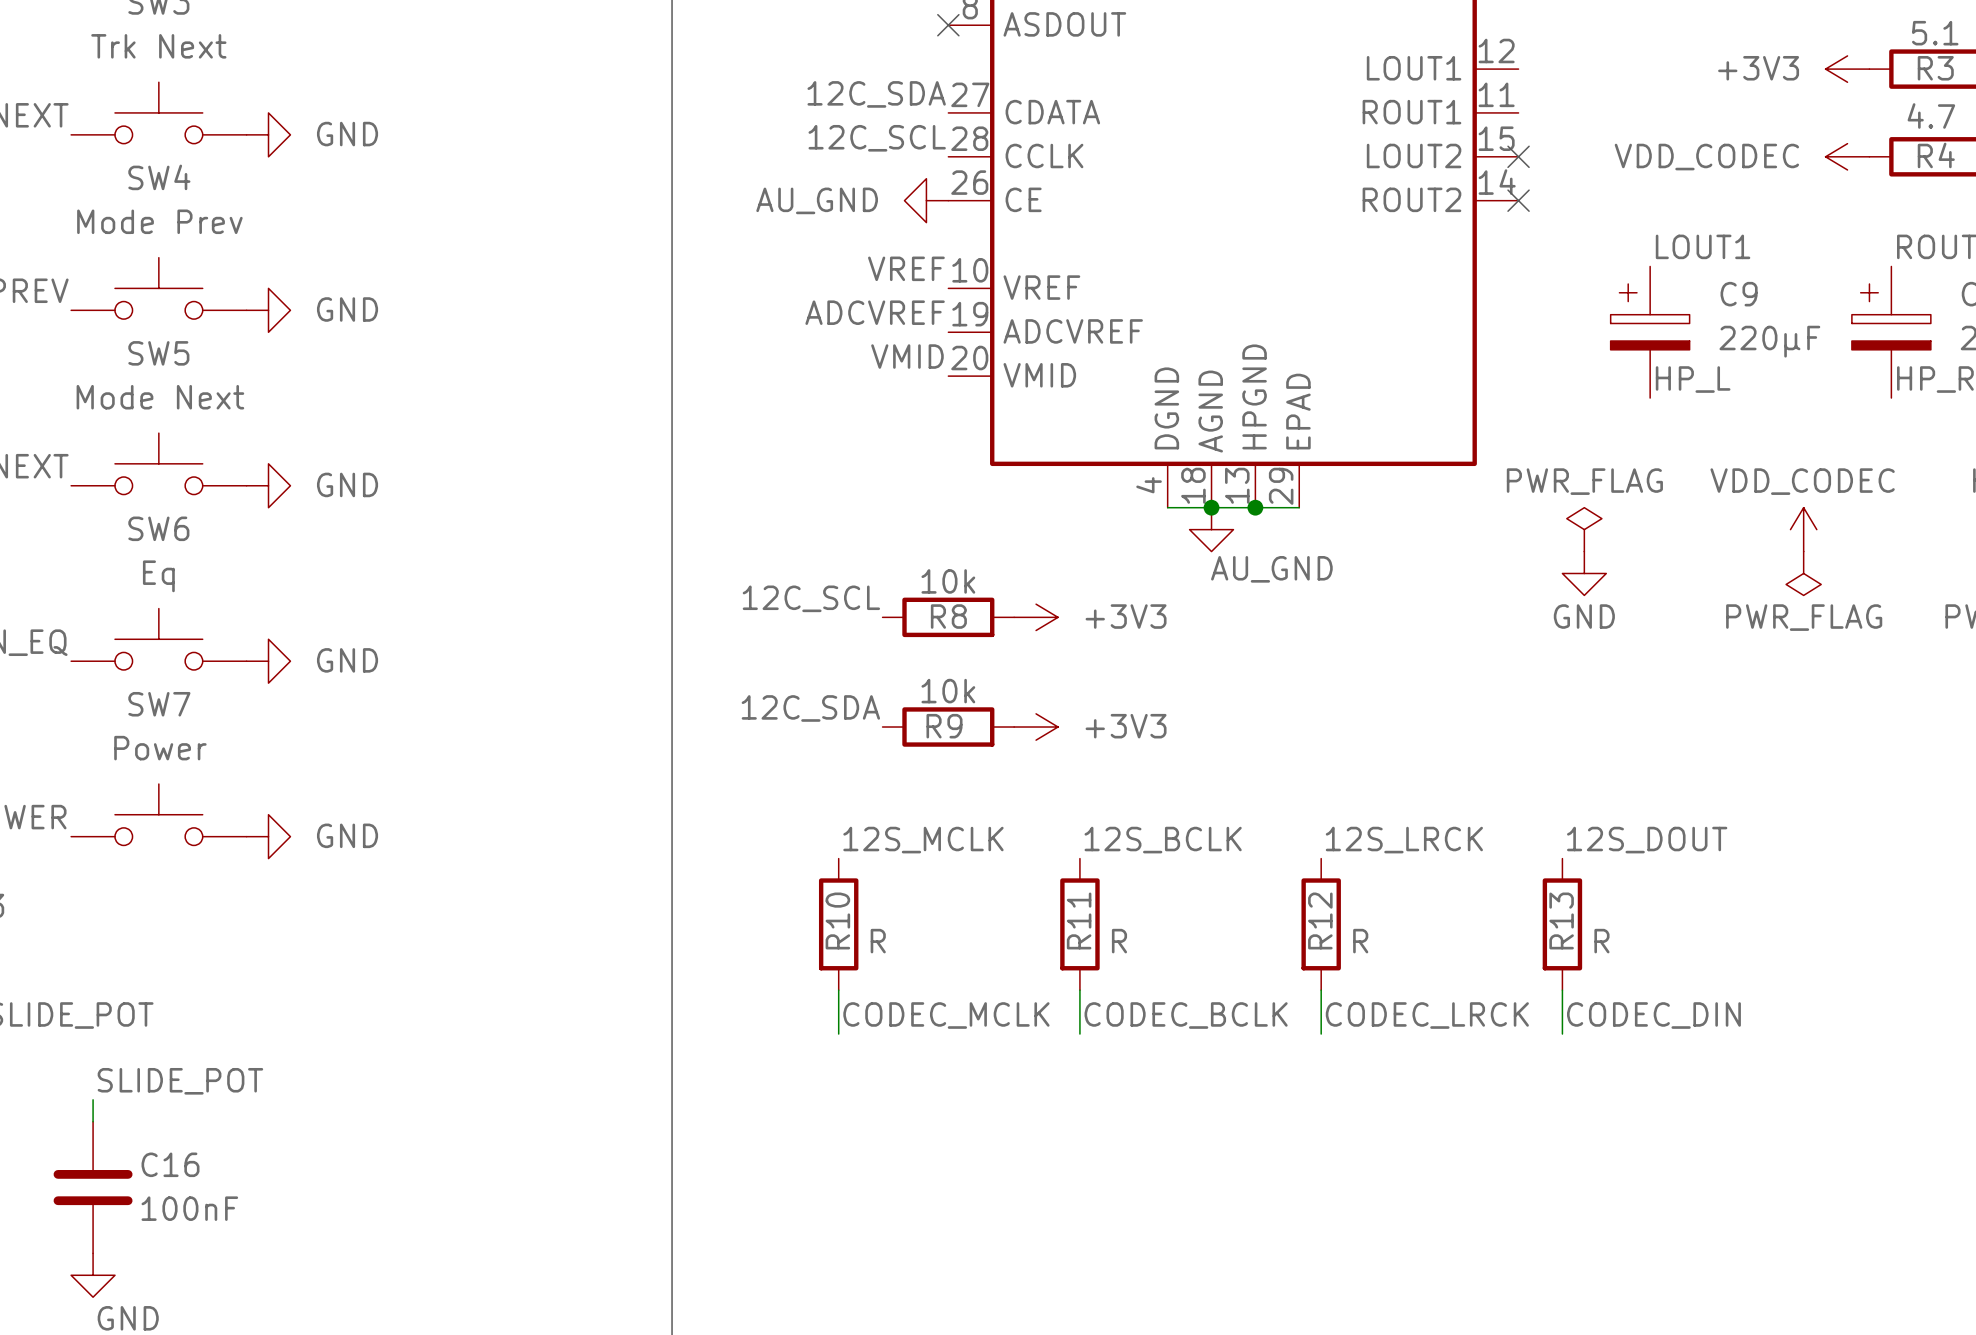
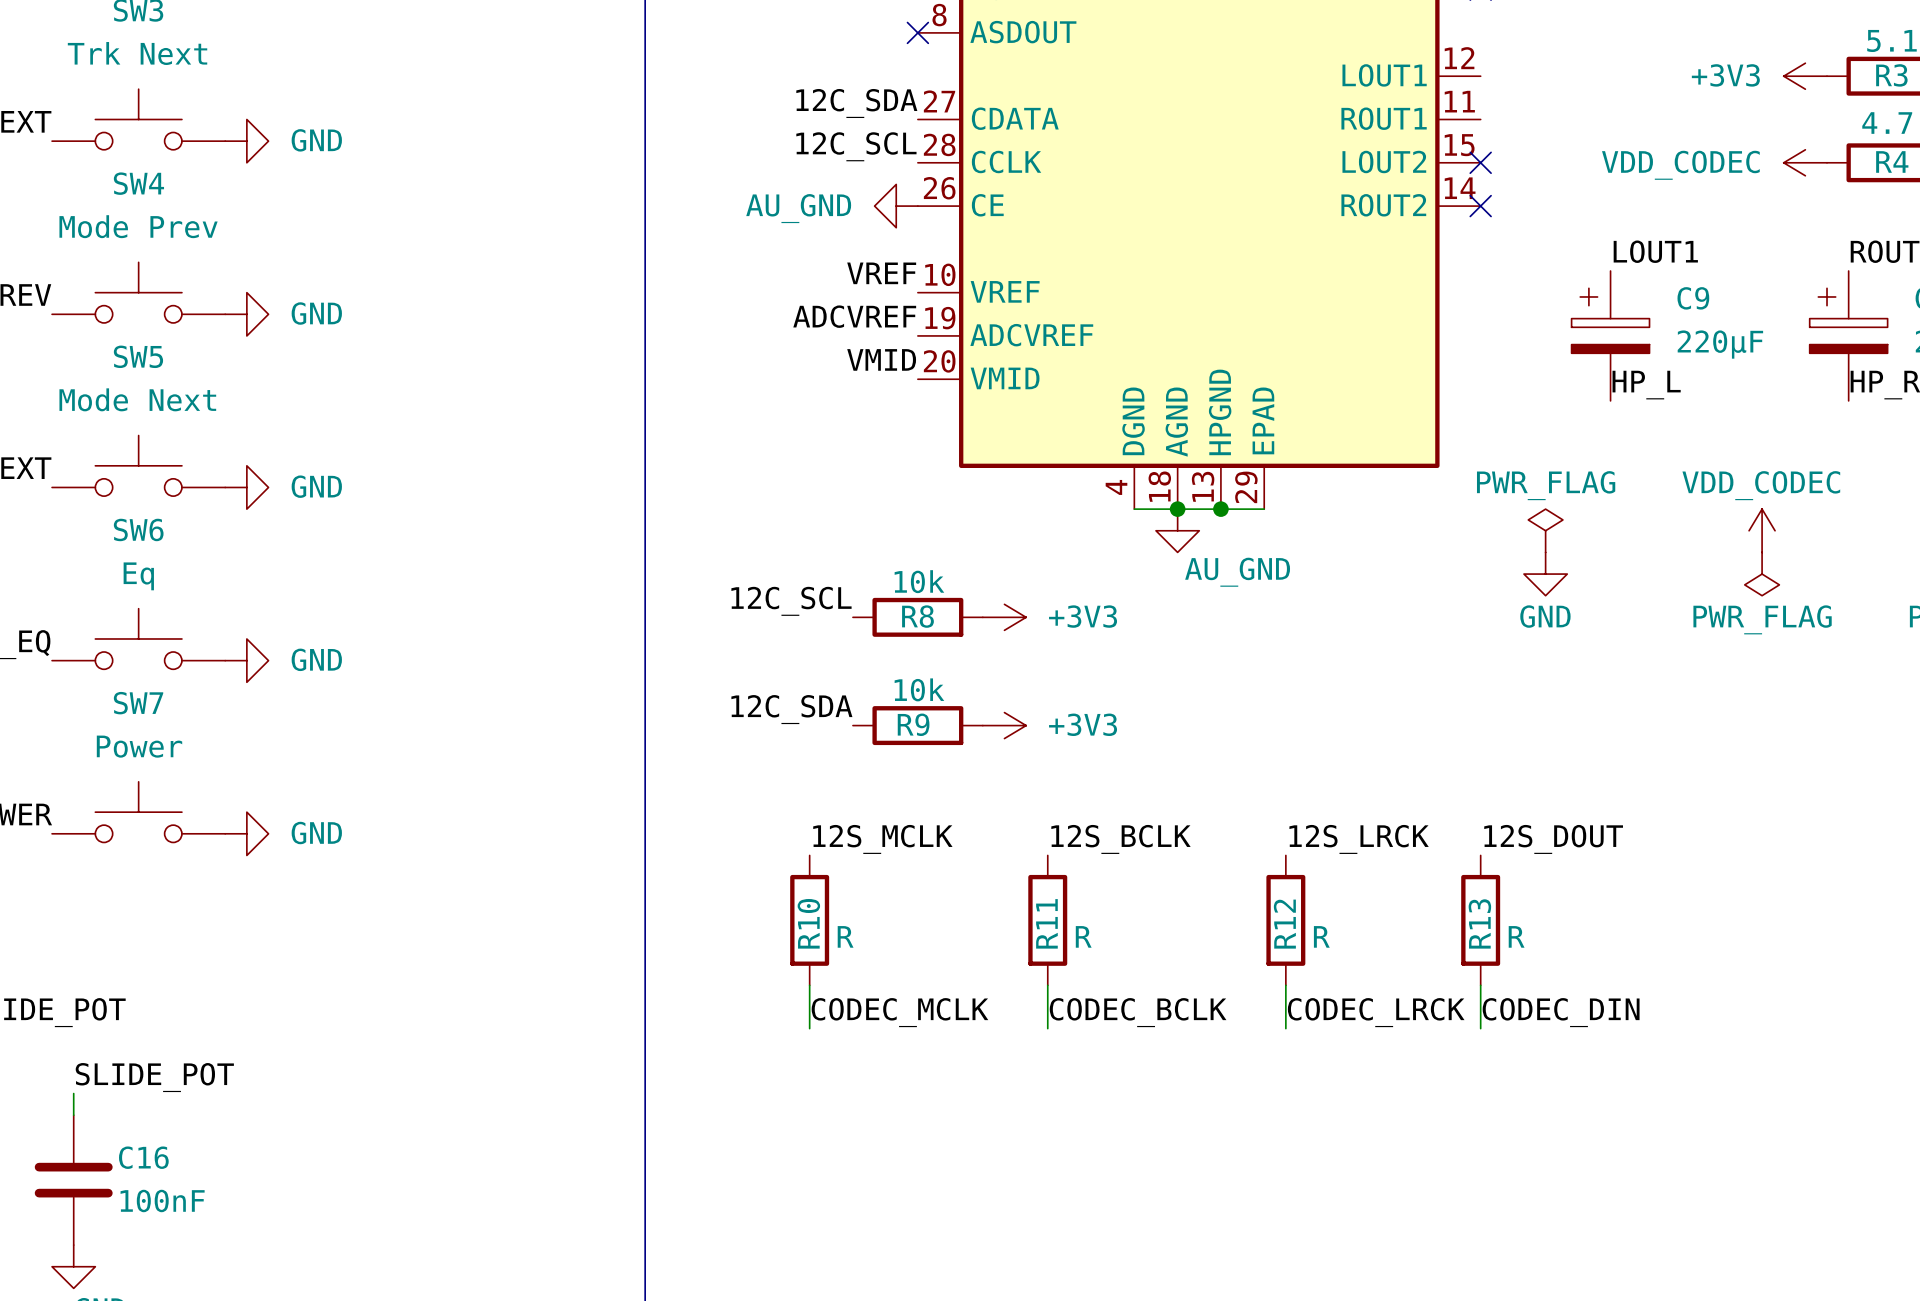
label position: 12S_DOUT (1647, 840) -> 12S_DOUT (1553, 839)
R13 position: (1562, 924) -> (1480, 920)
wire: (1562, 990) (1562, 1034) -> (1480, 985) (1480, 1028)
label position: CODEC_DIN (1653, 1015) -> CODEC_DIN (1561, 1012)

